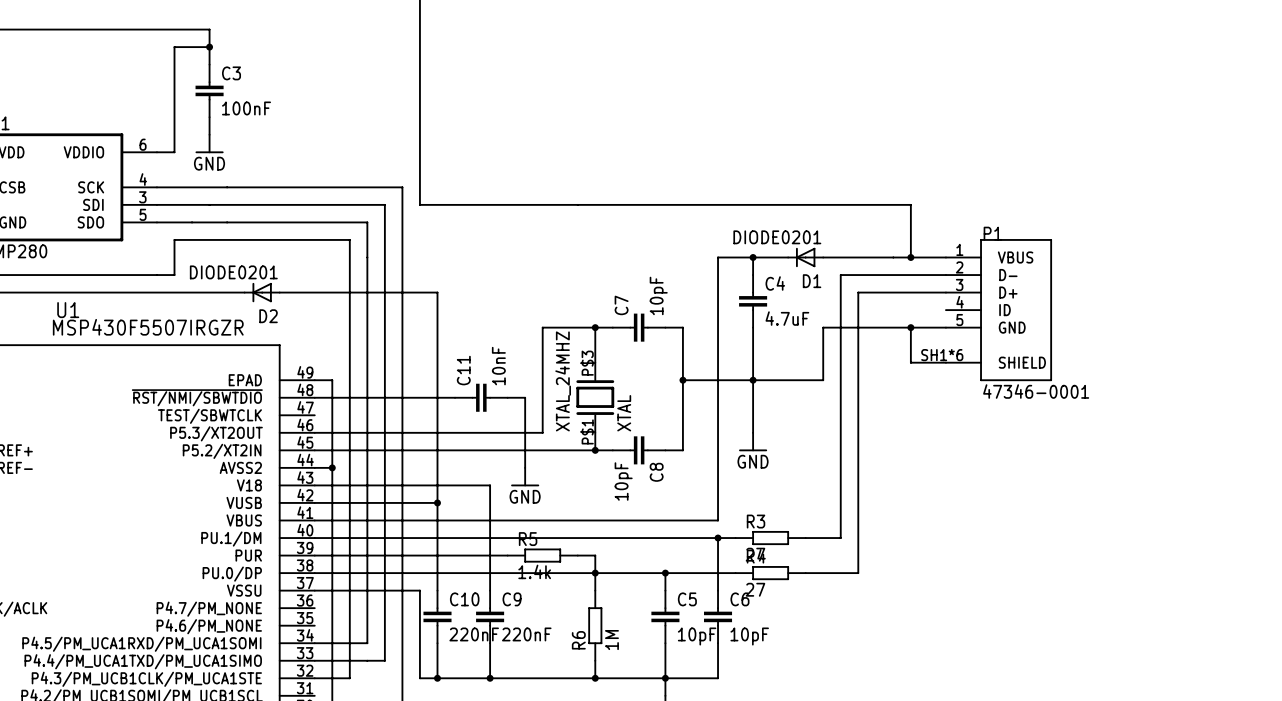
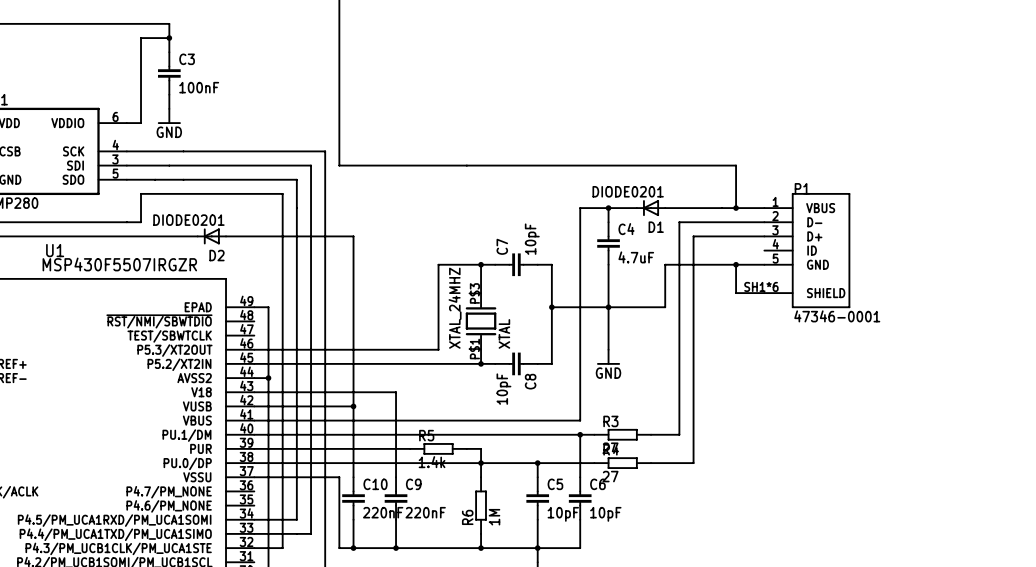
wire: (314, 397) (455, 397) -> none
C11: 10nF (481, 397) -> none
wire: (507, 397) (525, 397) (525, 467) -> none
power symbol: GND (525, 477) -> none

